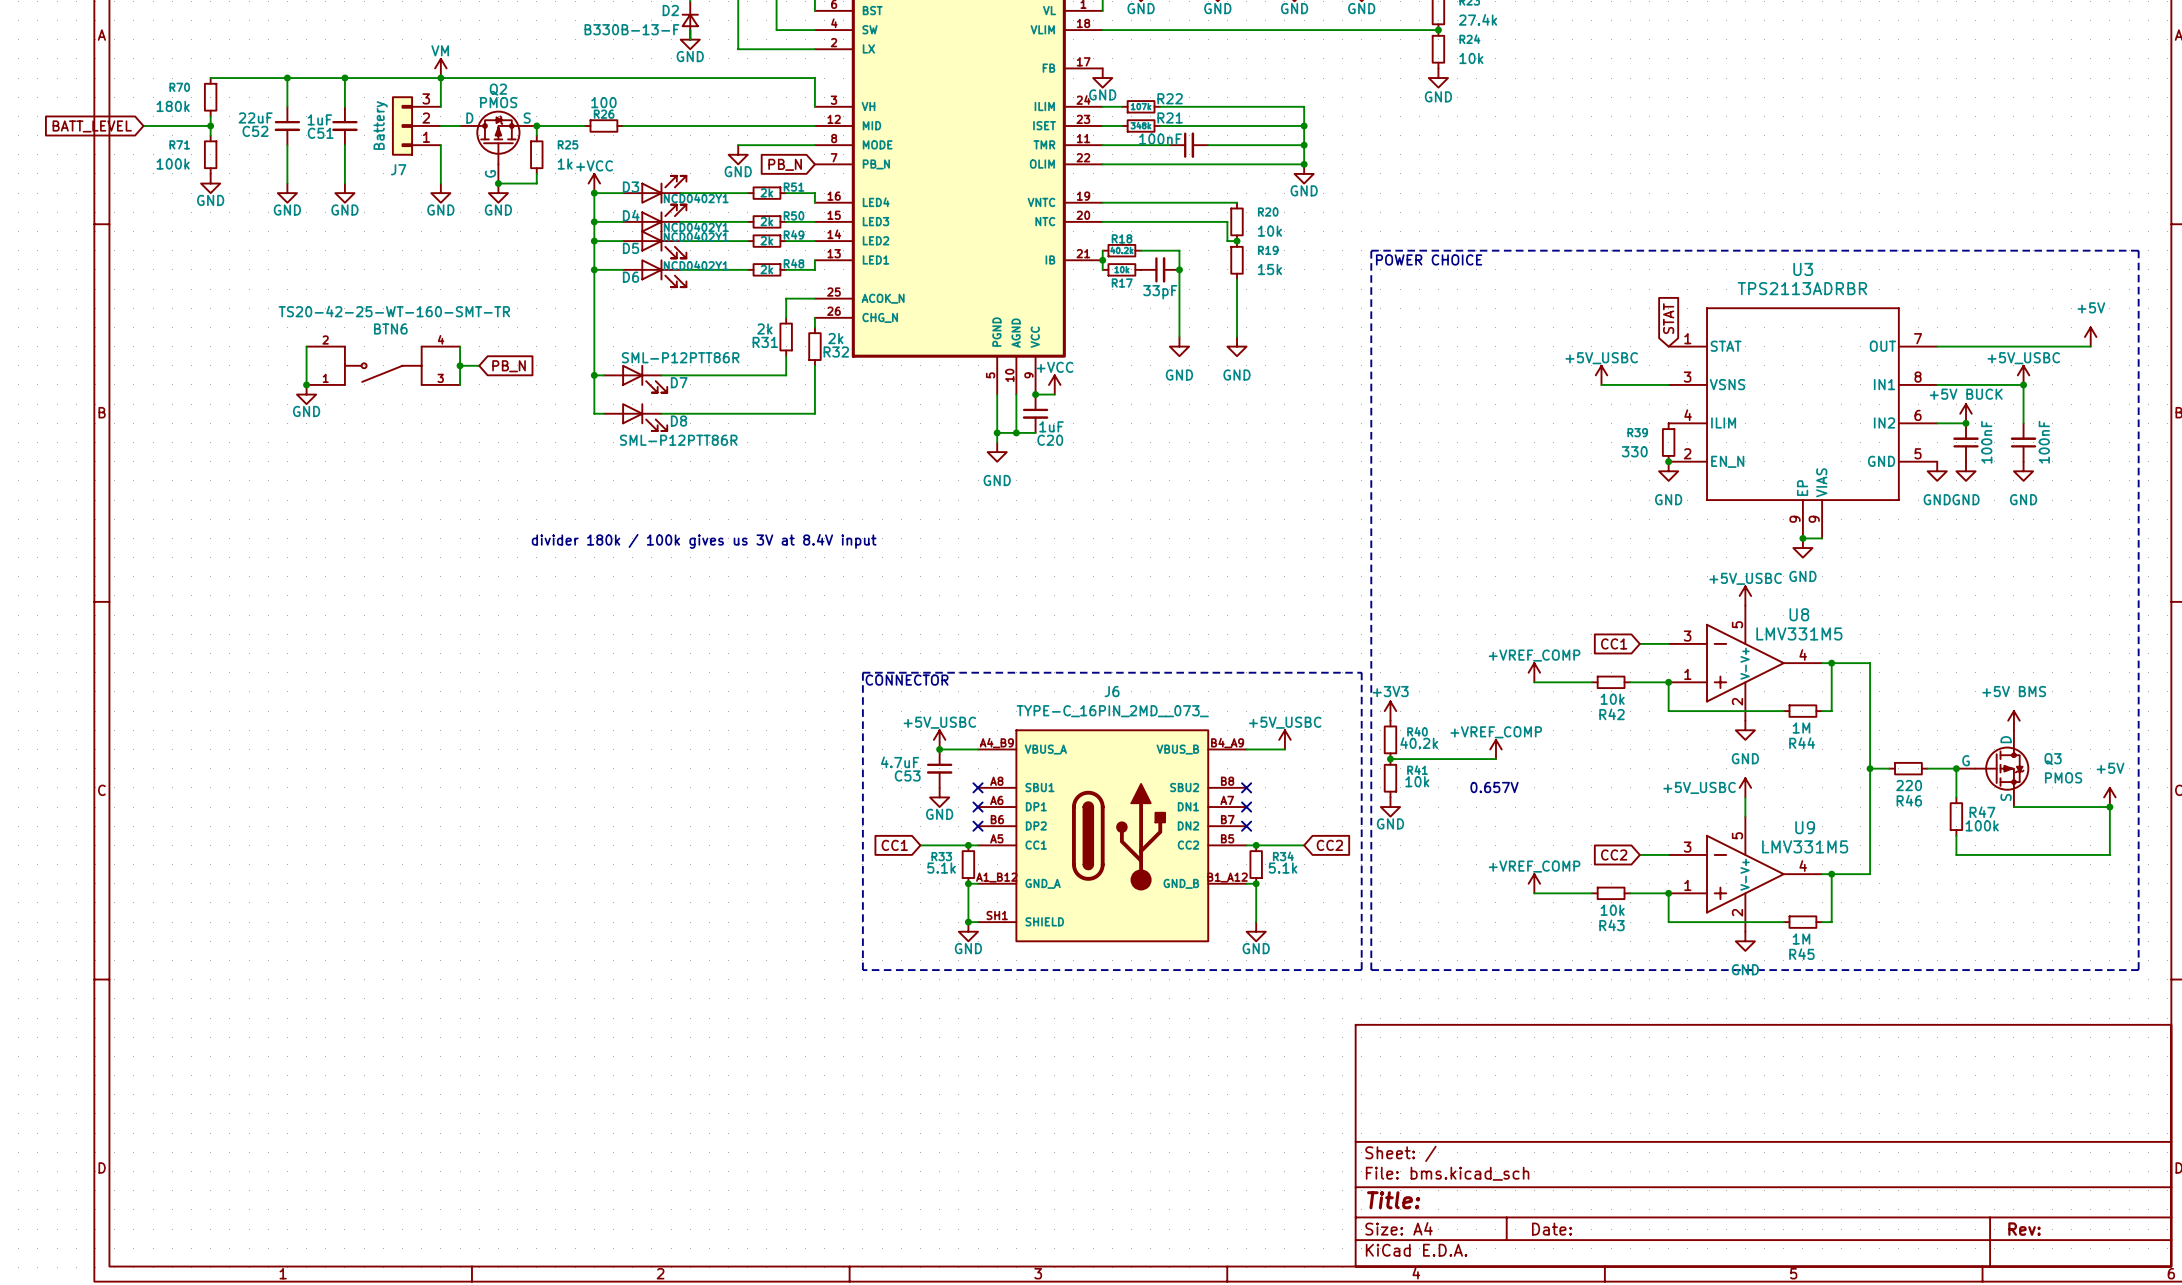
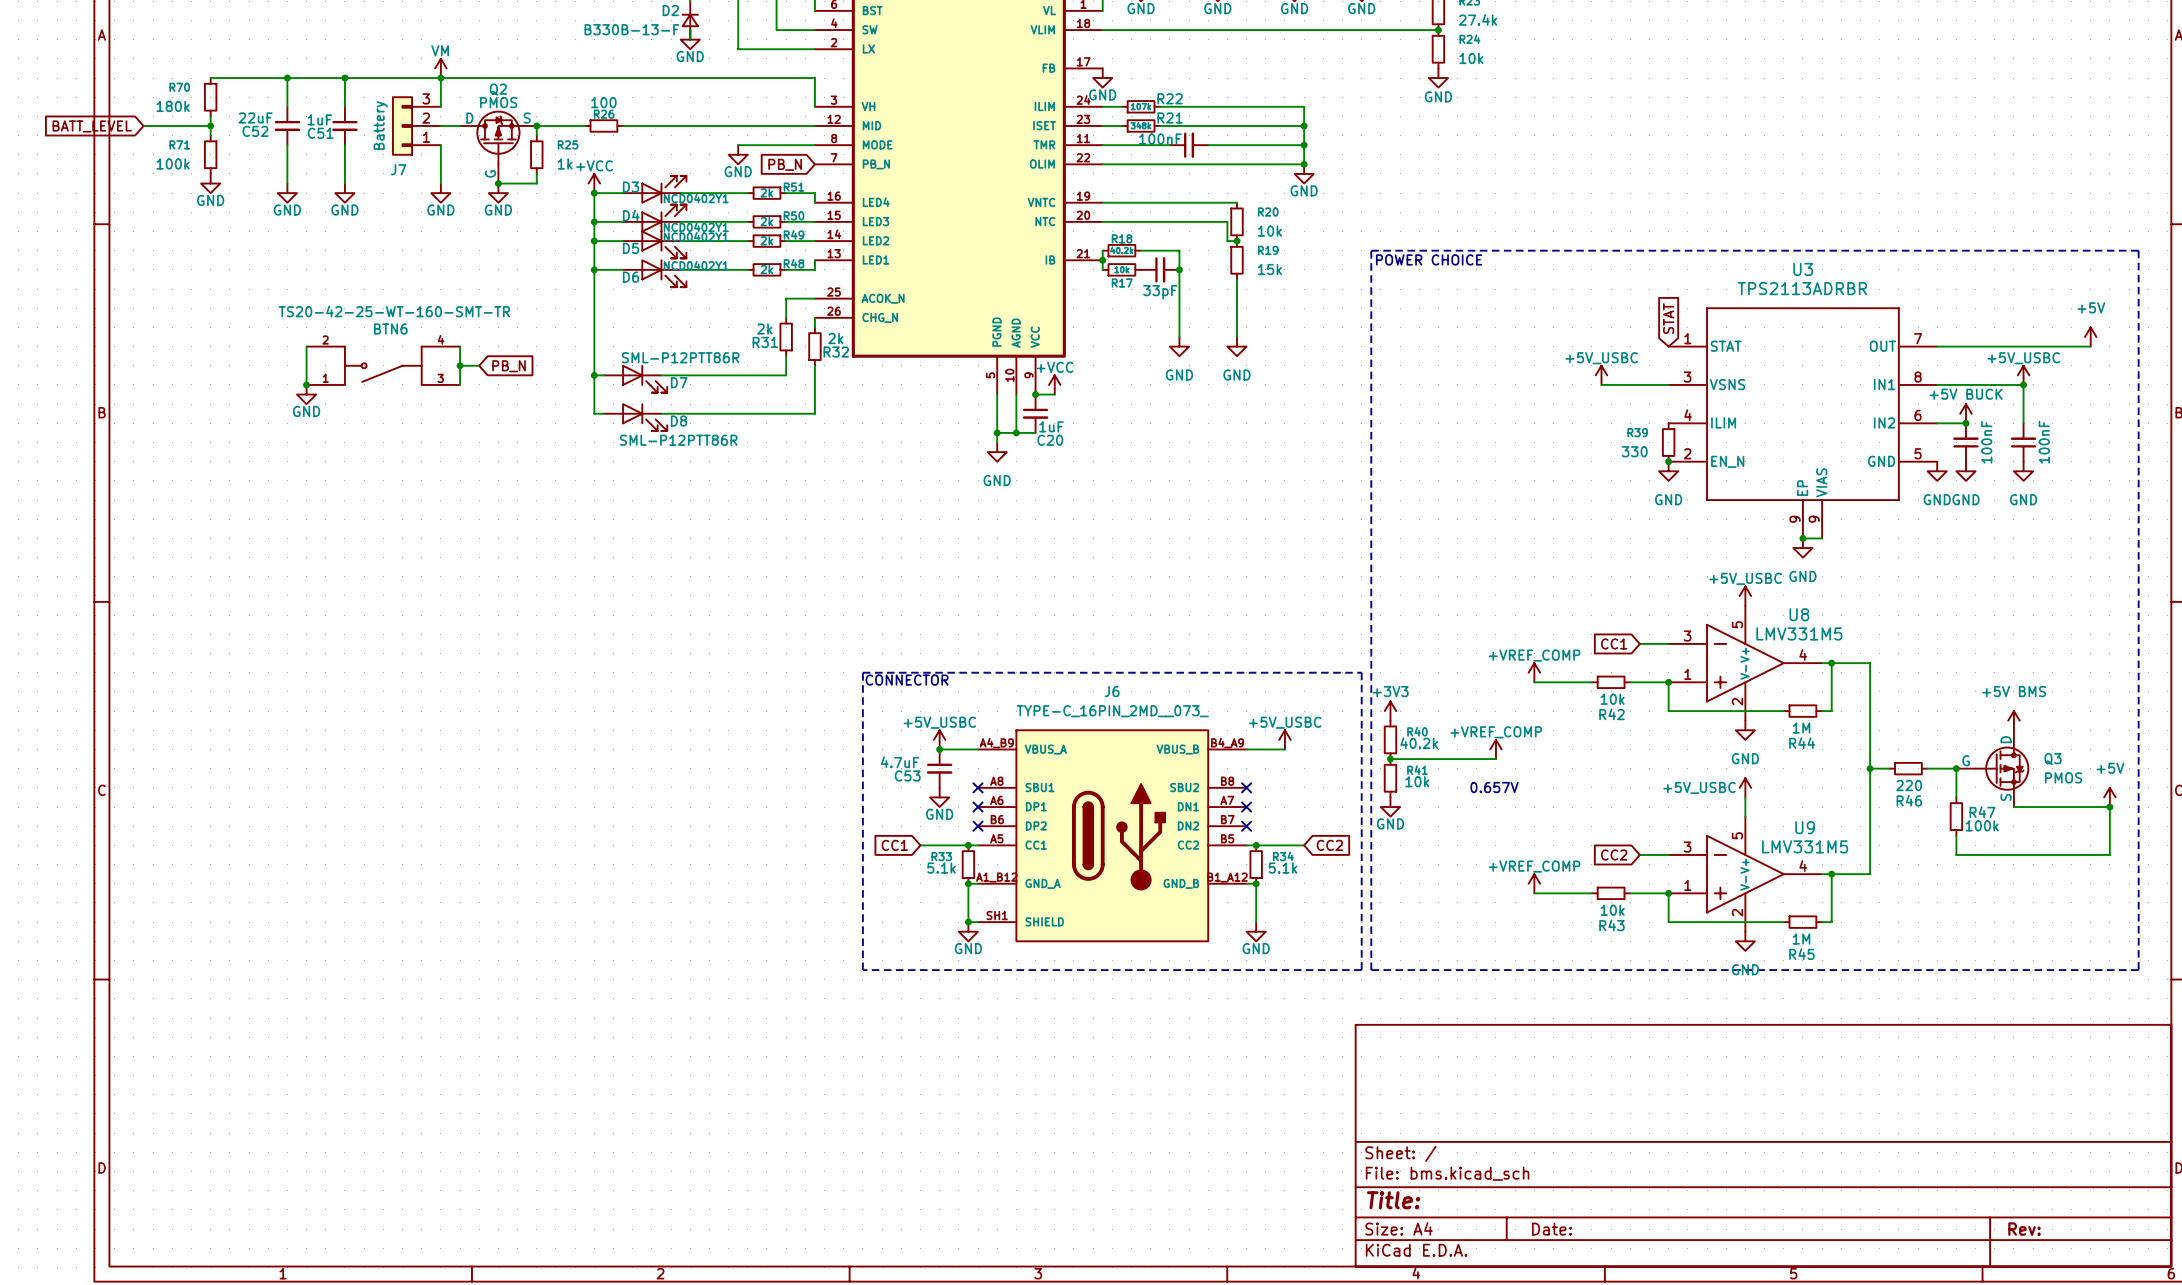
text: divider 180k / 100k gives us 3V at 8.4V input (704, 541) -> none

